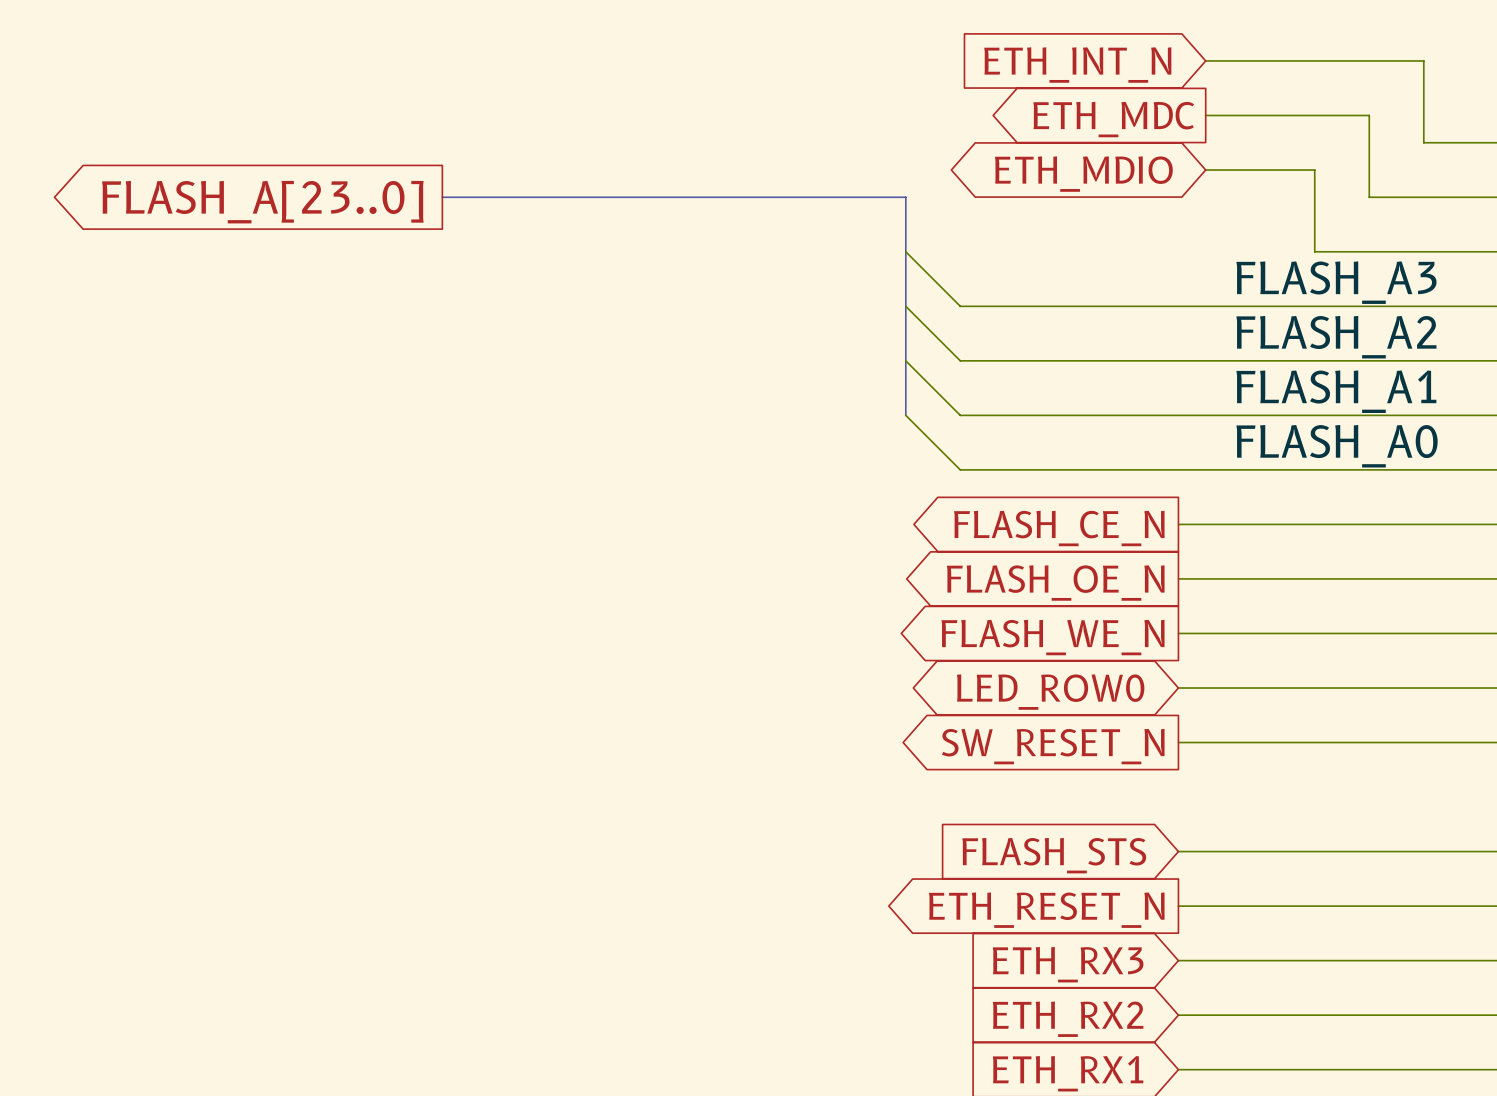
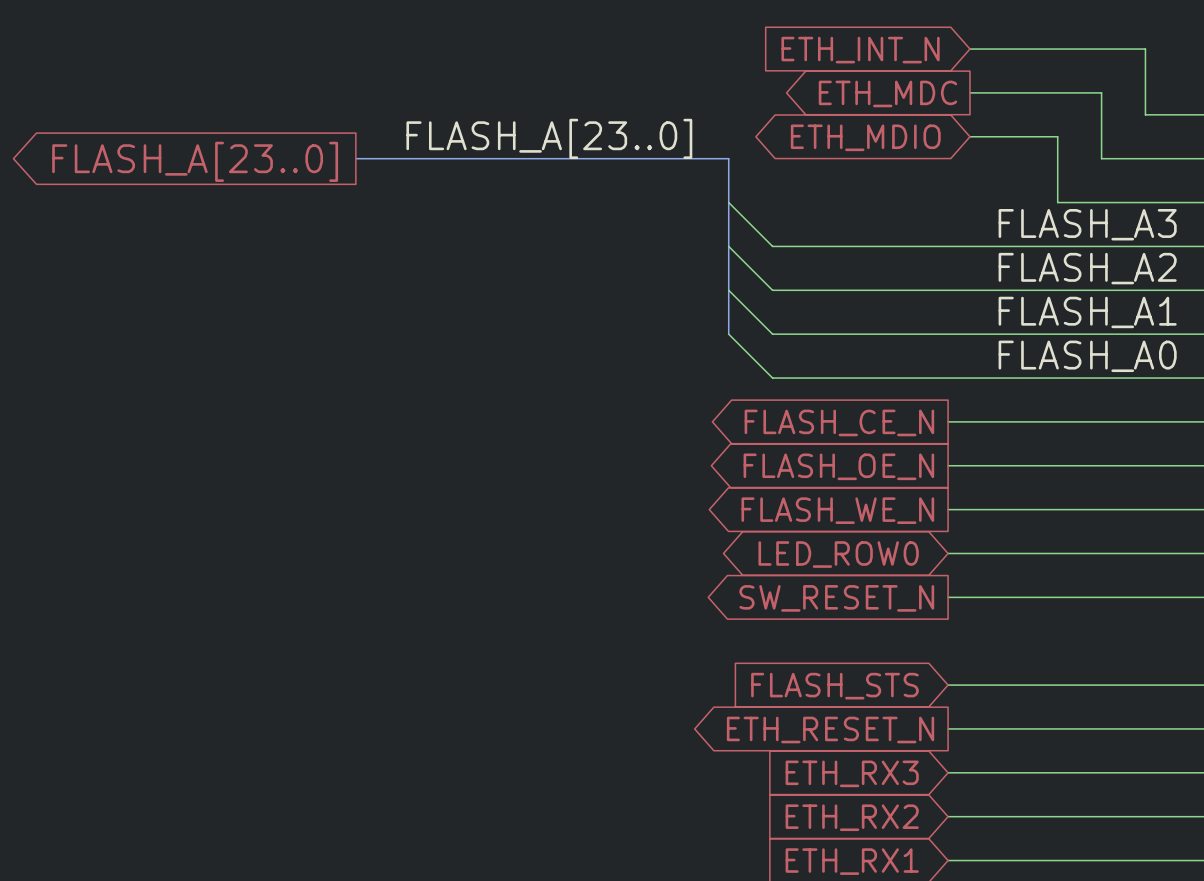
label: none -> FLASH_A[23..0] (549, 138)

